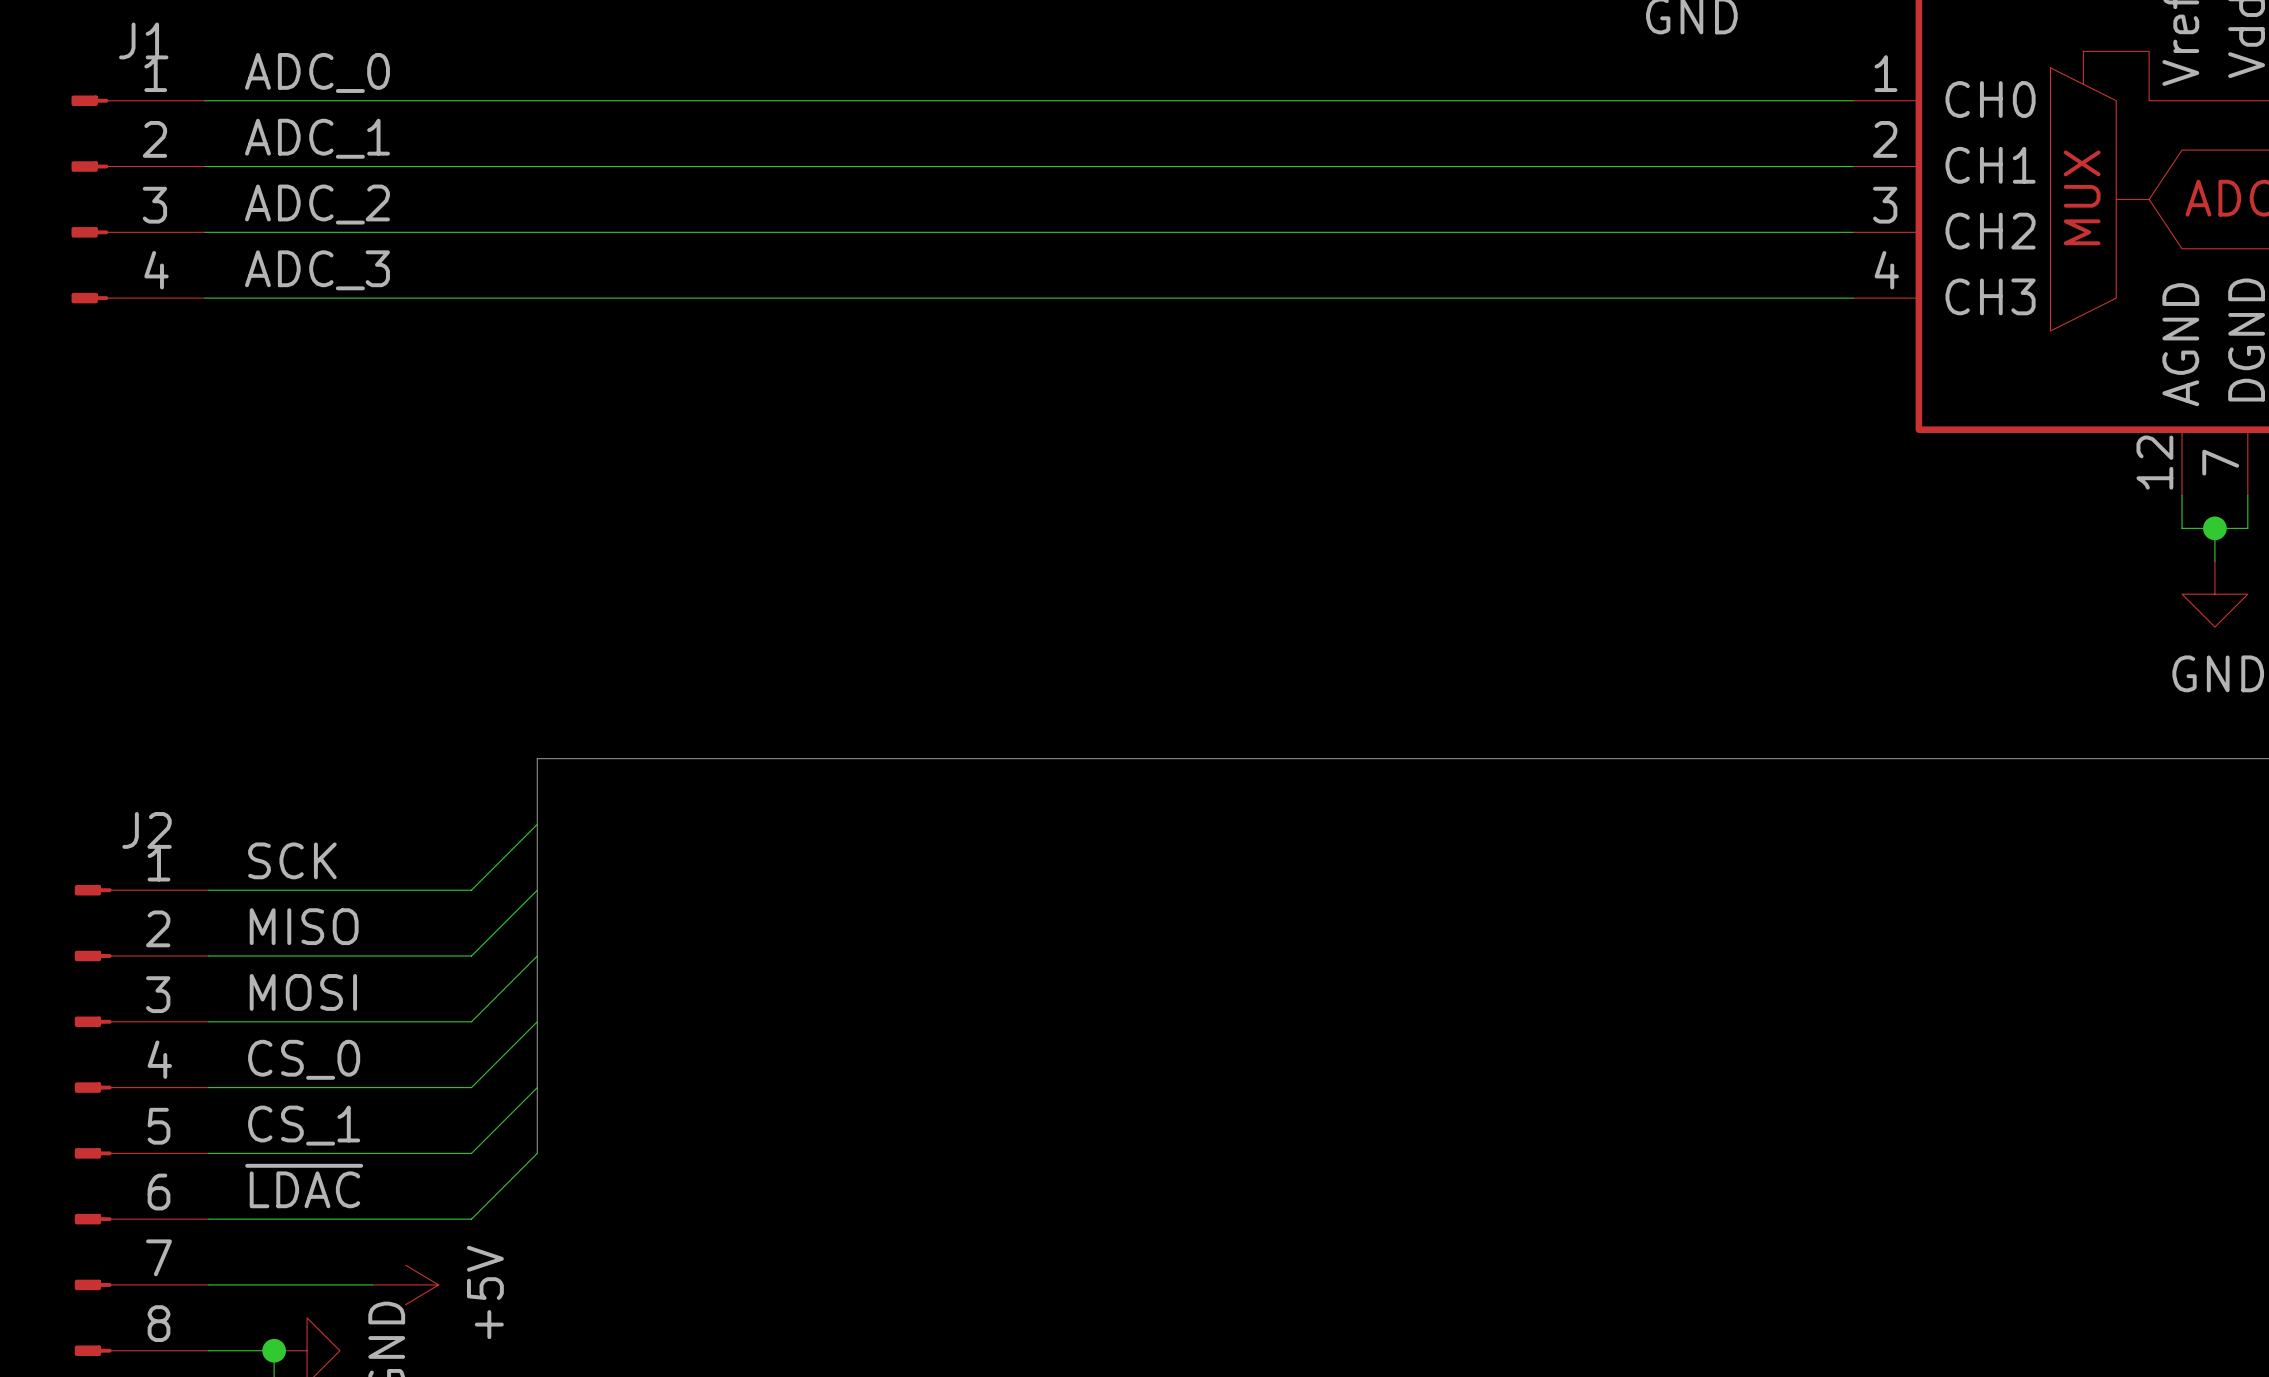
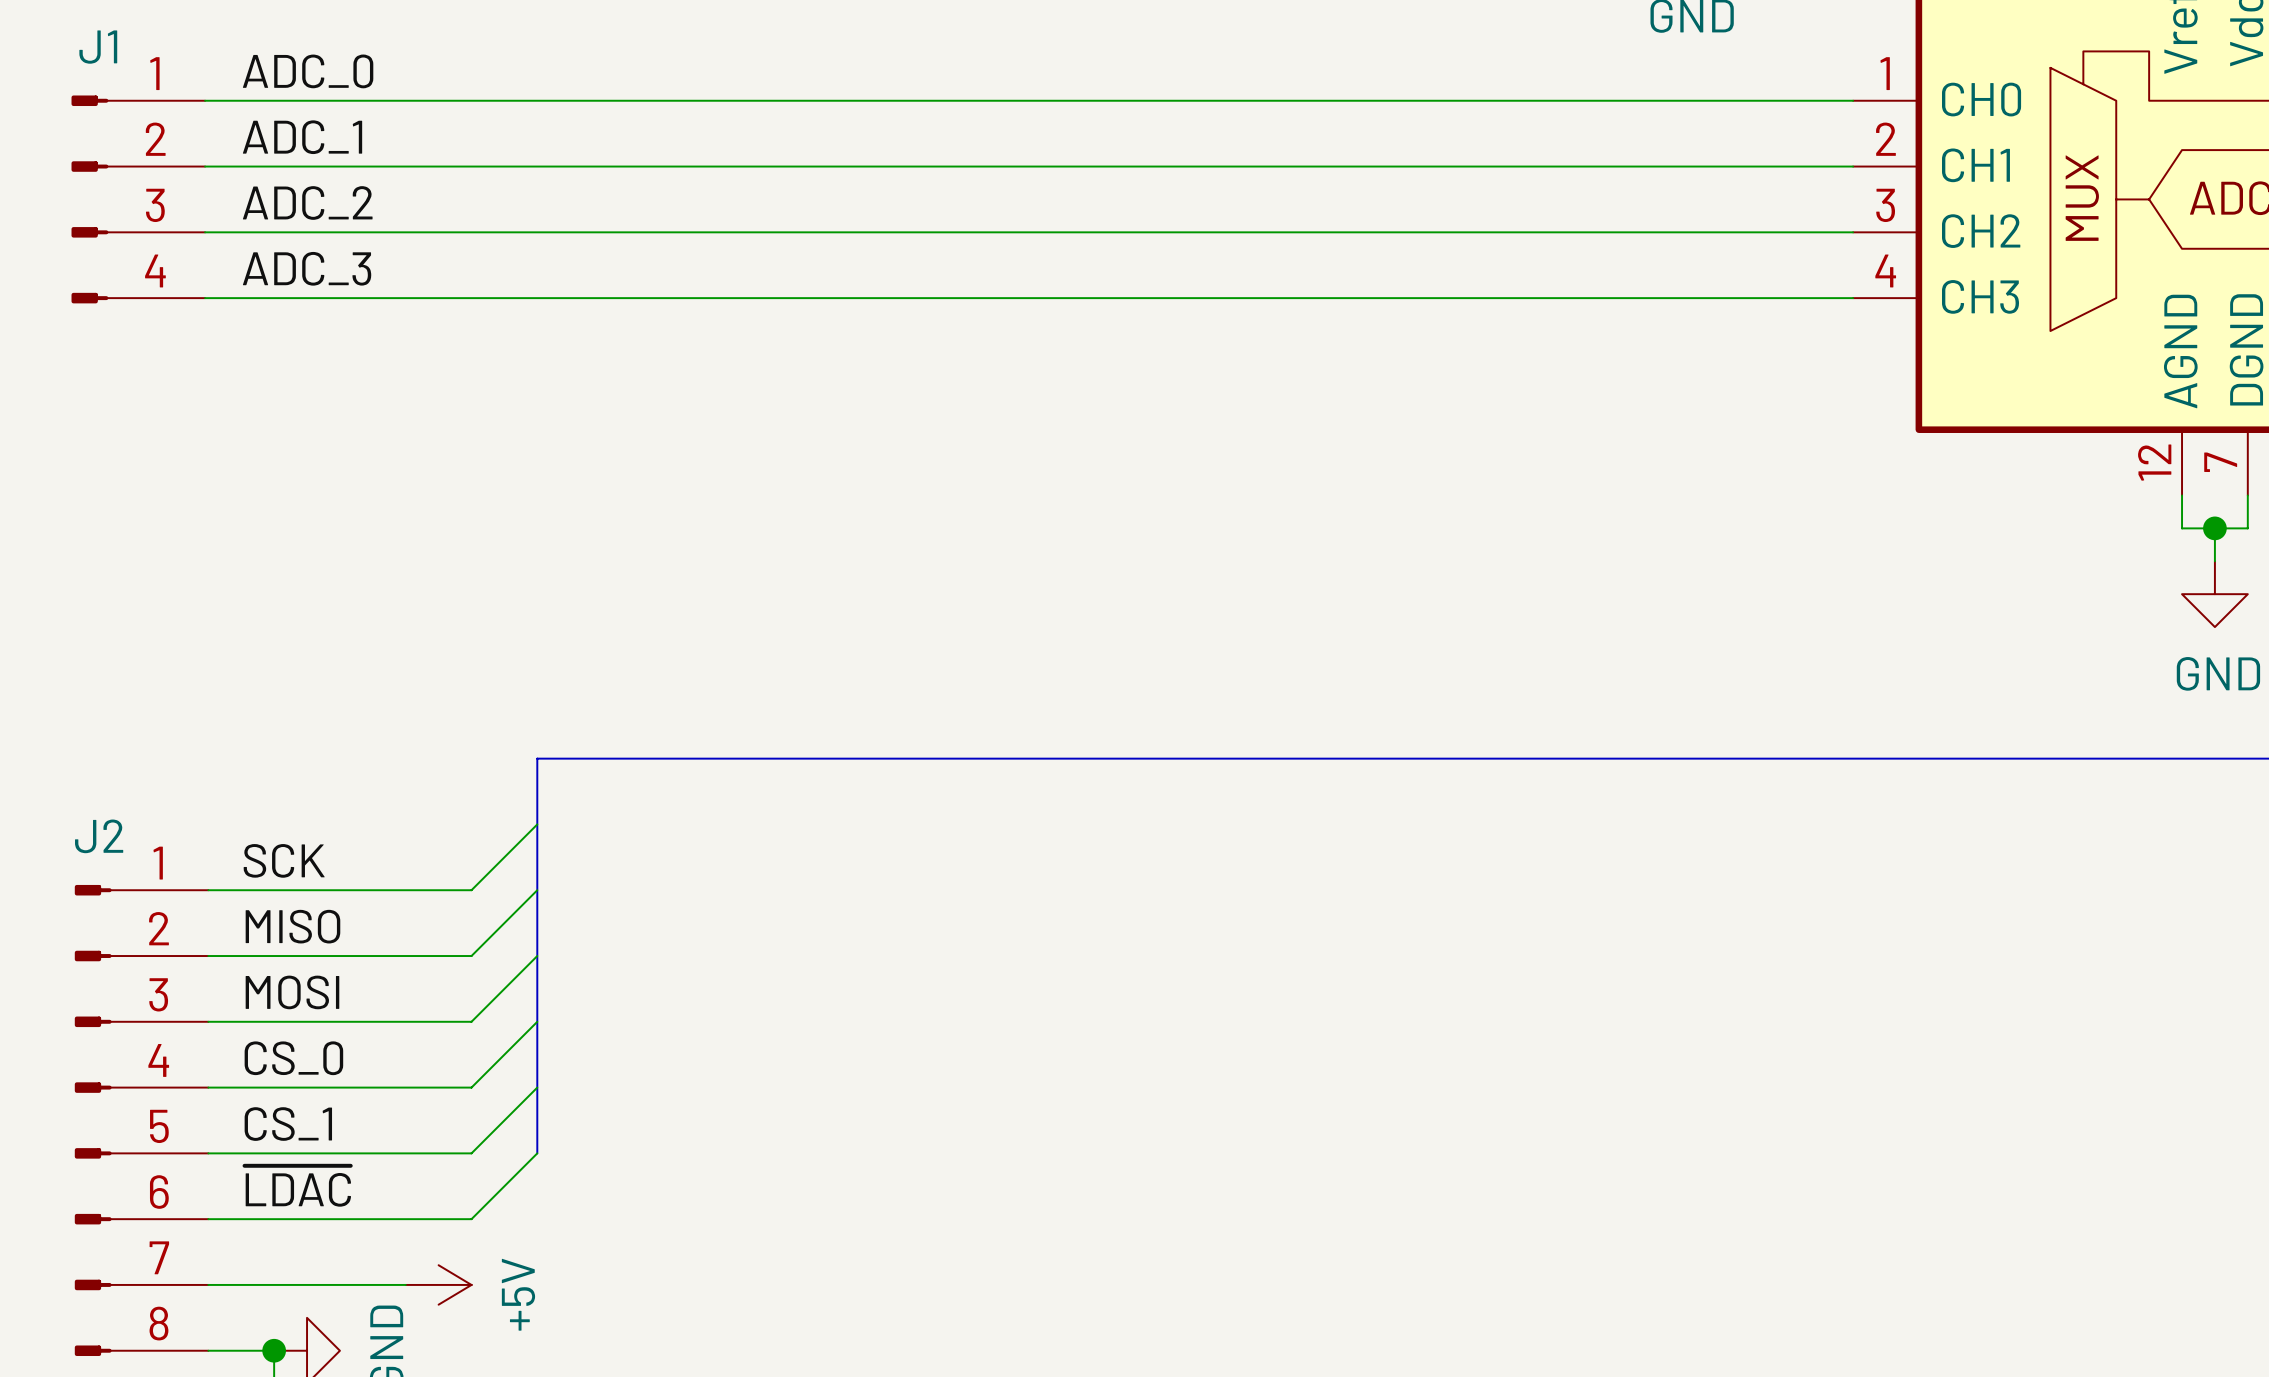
J1 name position: J1 (143, 40) -> J1 (98, 47)
J2 name position: J2 (147, 830) -> J2 (99, 836)
power symbol position: +5V (405, 1284) -> +5V (438, 1284)

